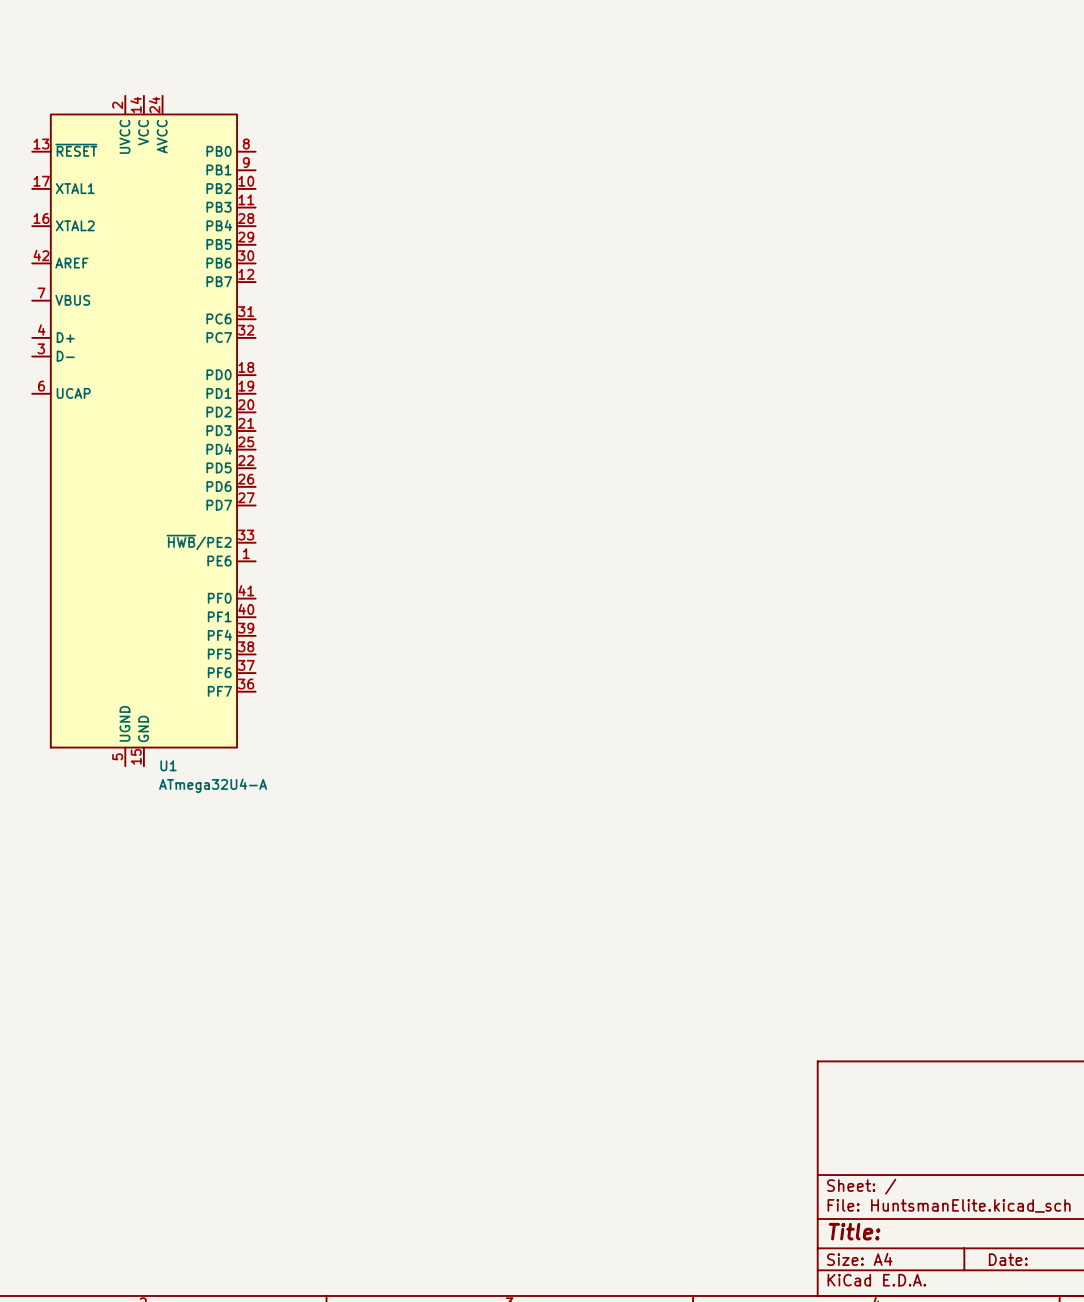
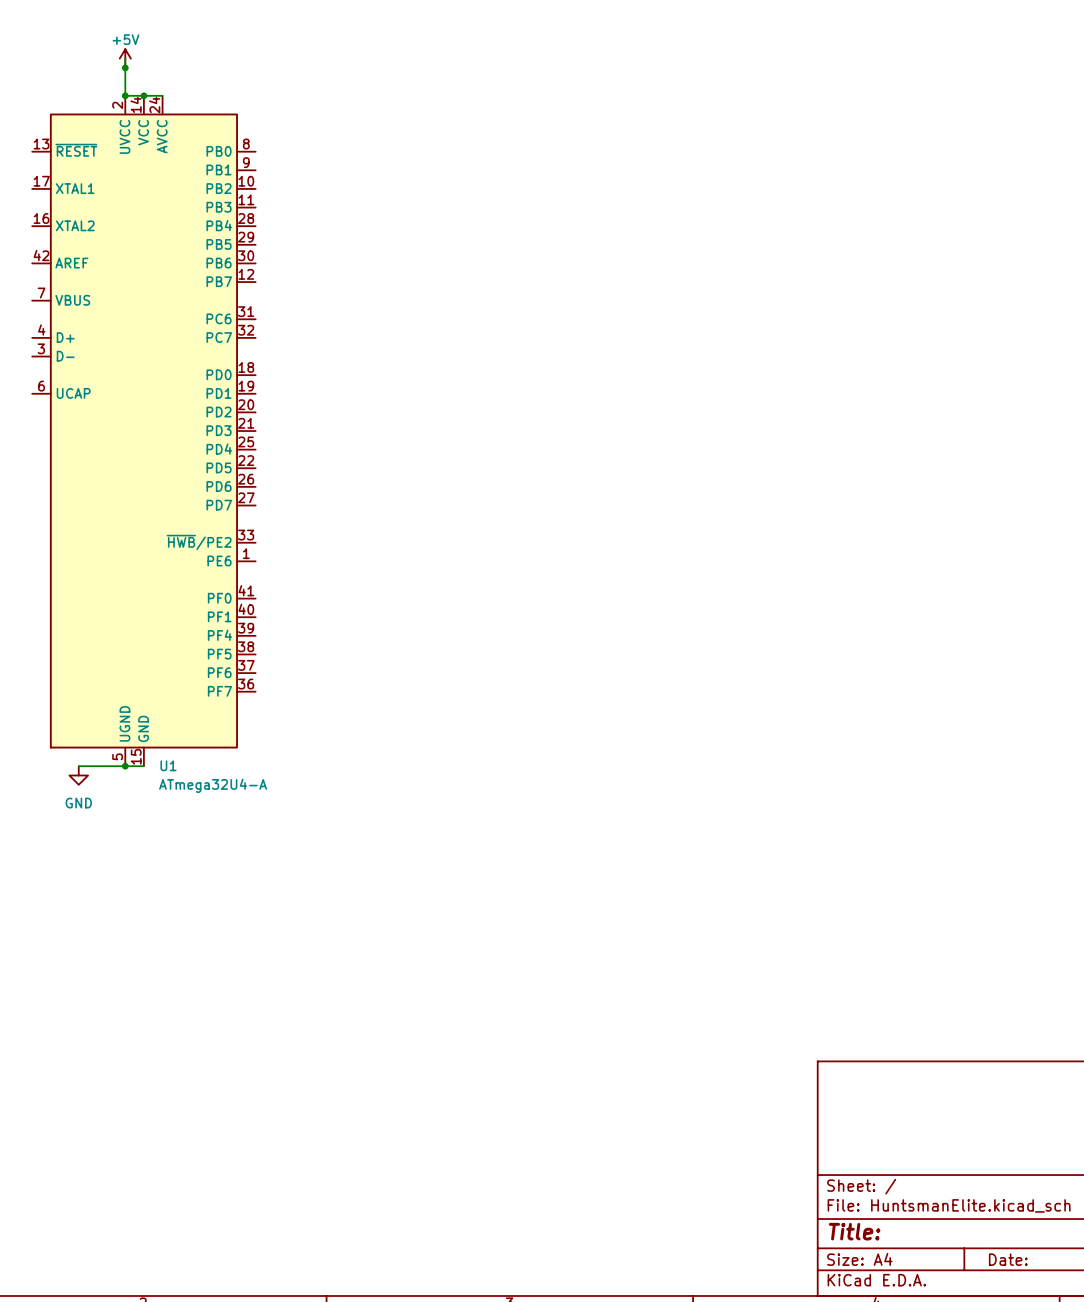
wire: none -> (125, 58) (125, 95) (162, 95)
power symbol: none -> +5V (125, 58)
junction: none -> (125, 67)
junction: none -> (125, 95)
junction: none -> (143, 95)
wire: none -> (78, 766) (143, 766)
junction: none -> (125, 766)
power symbol: none -> GND (78, 775)

